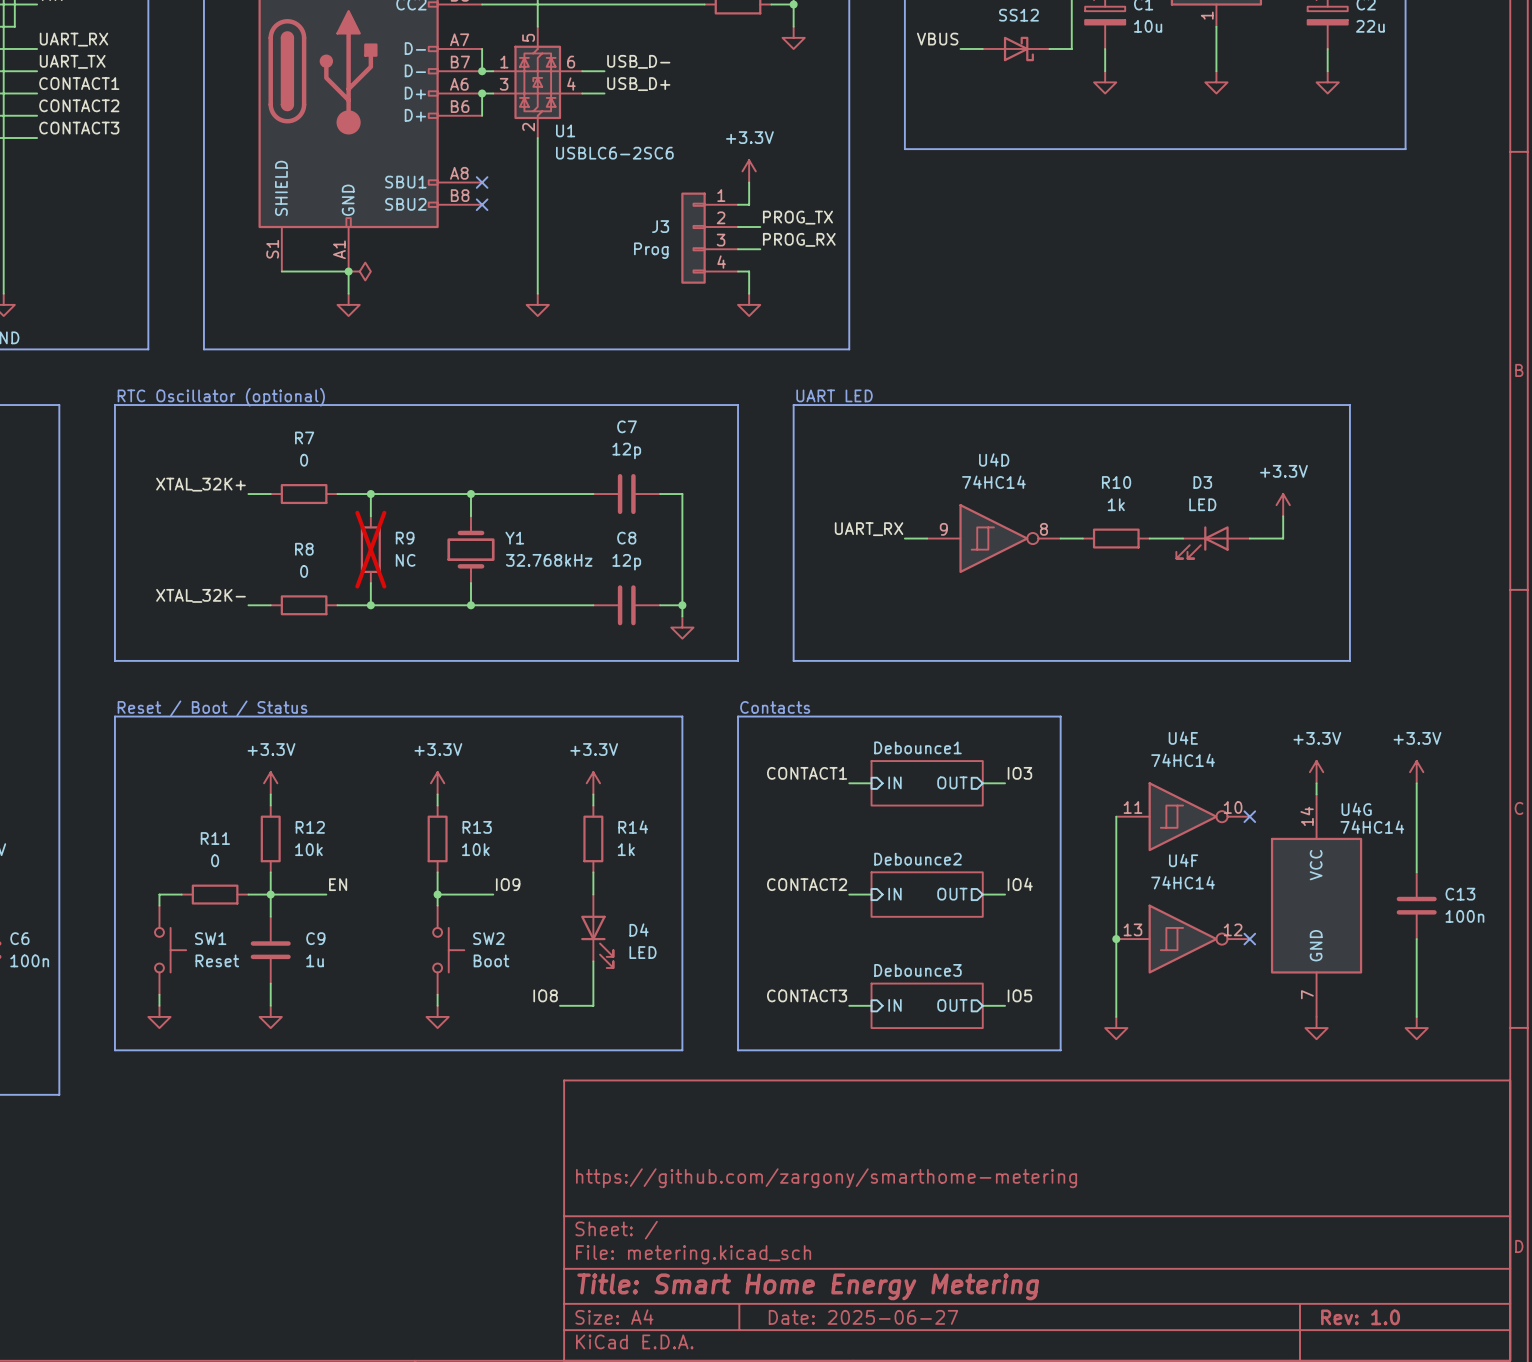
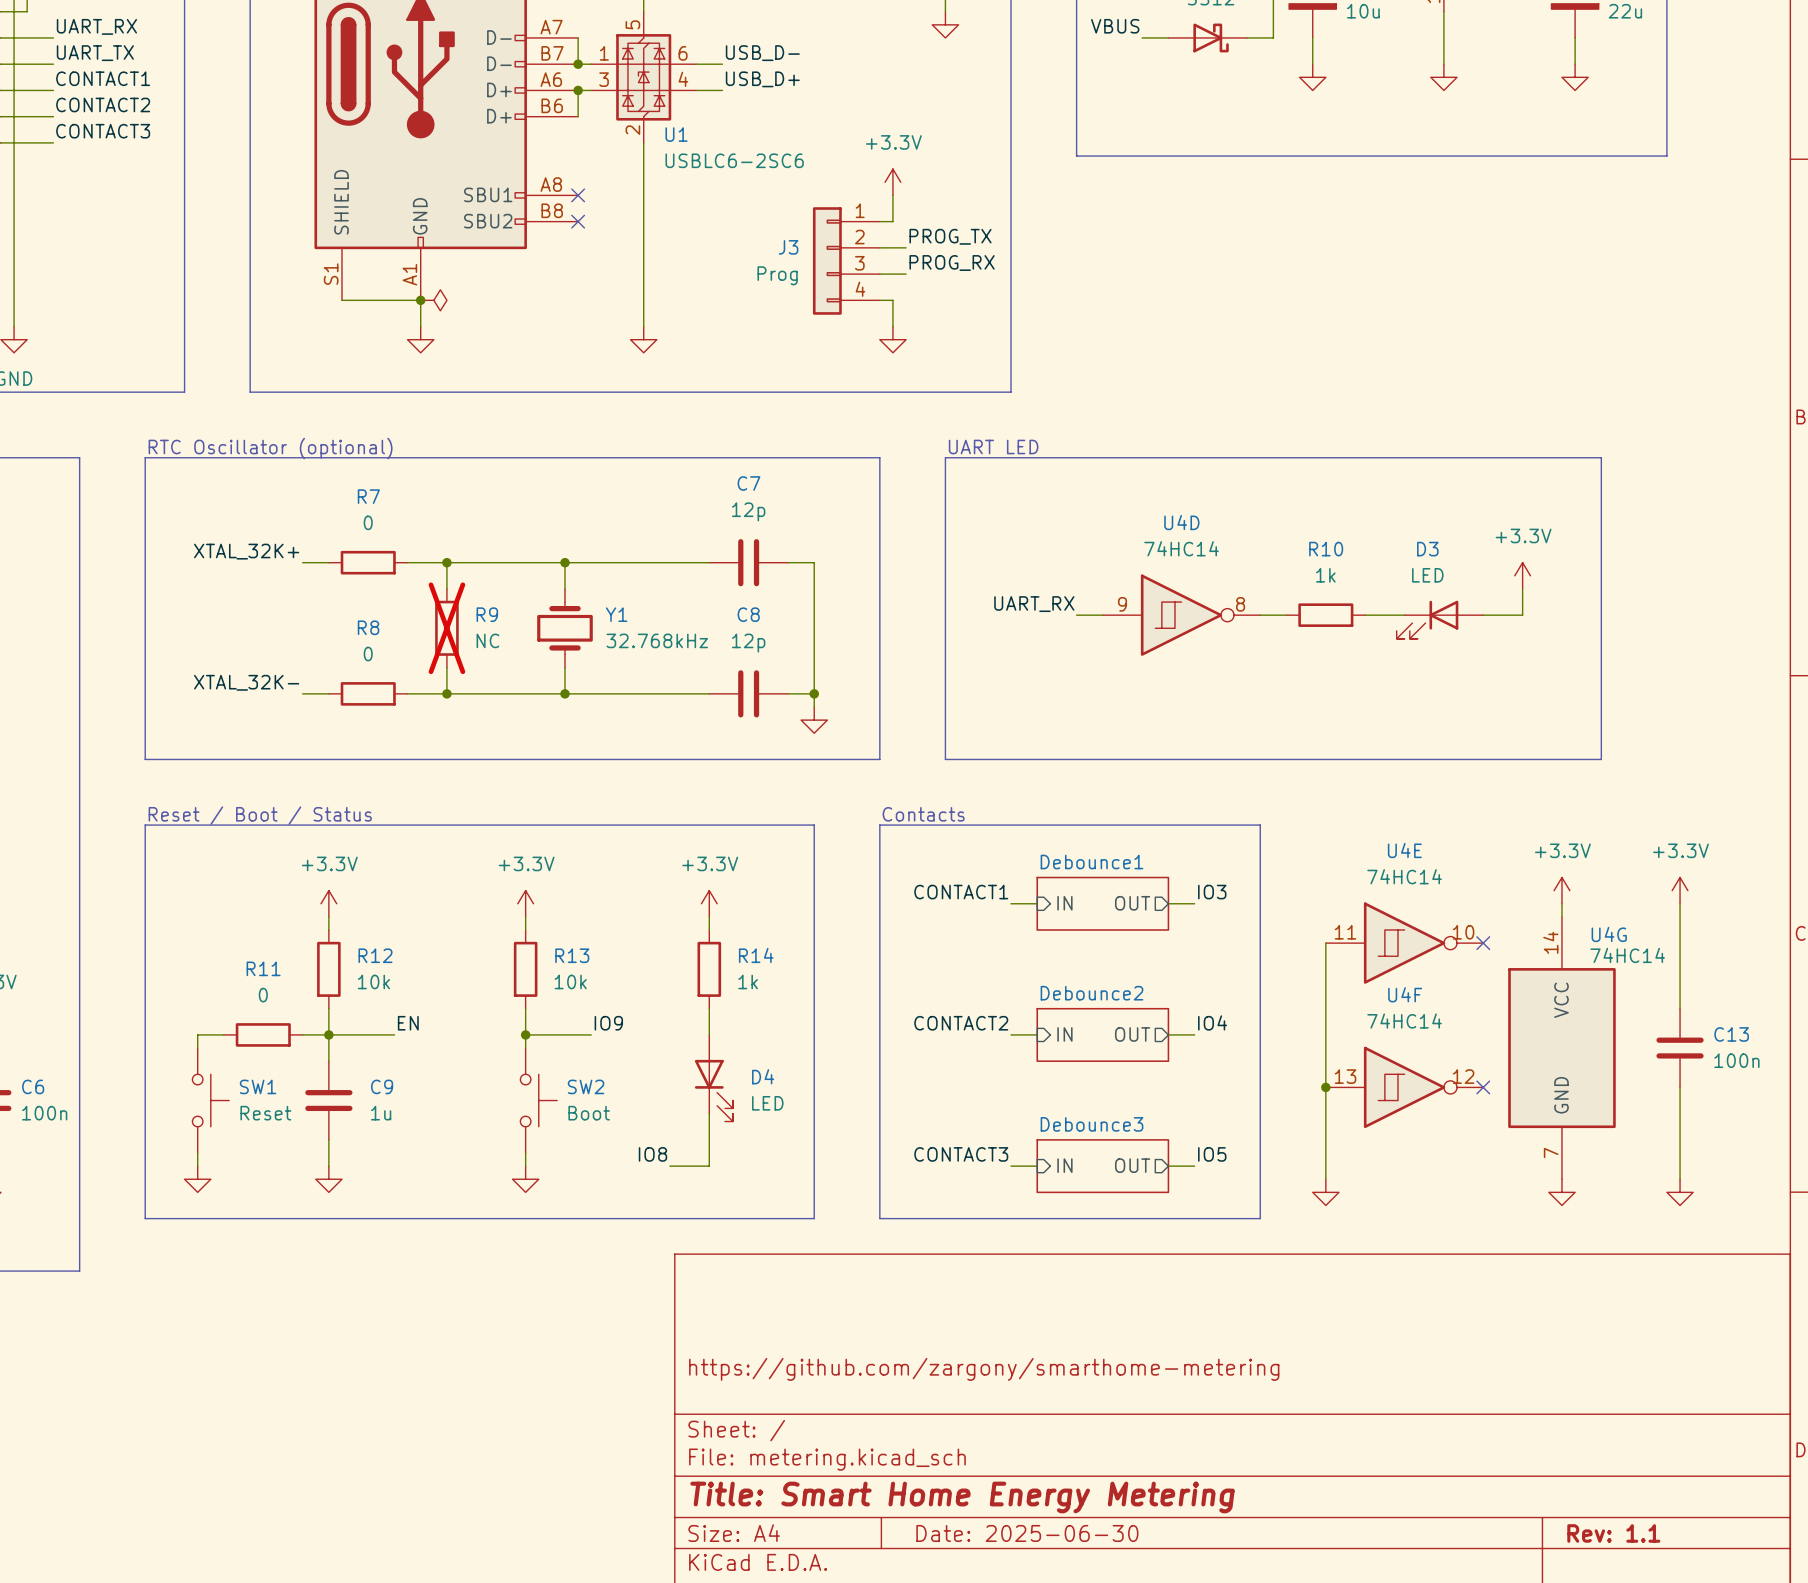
title block: Date: 2025-06-27 (863, 1317) -> Date: 2025-06-30 (1027, 1533)
title block: Rev: 1.0 (1360, 1317) -> Rev: 1.1 (1613, 1533)

